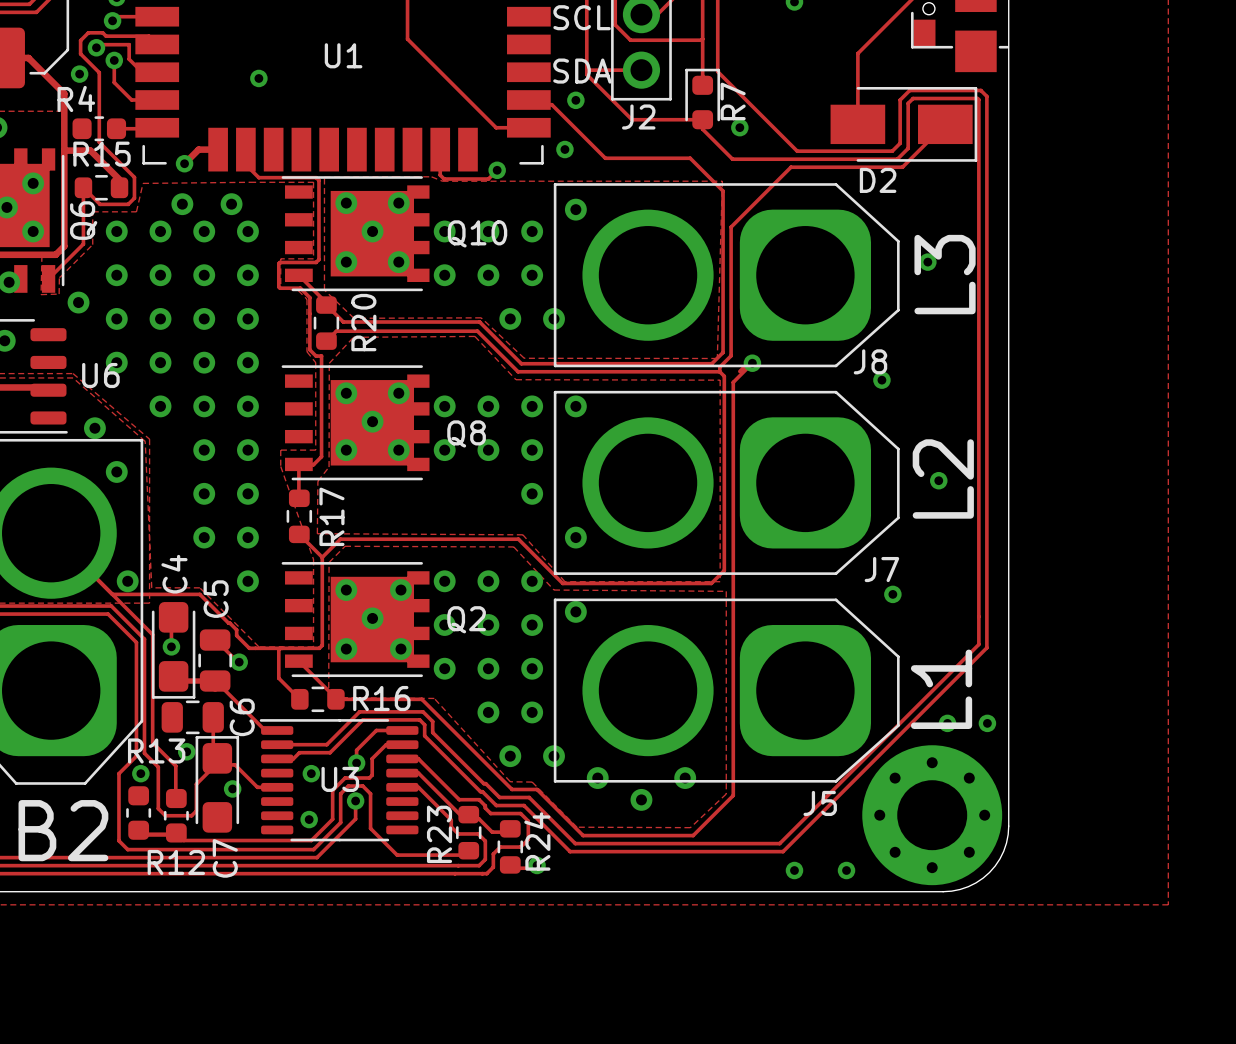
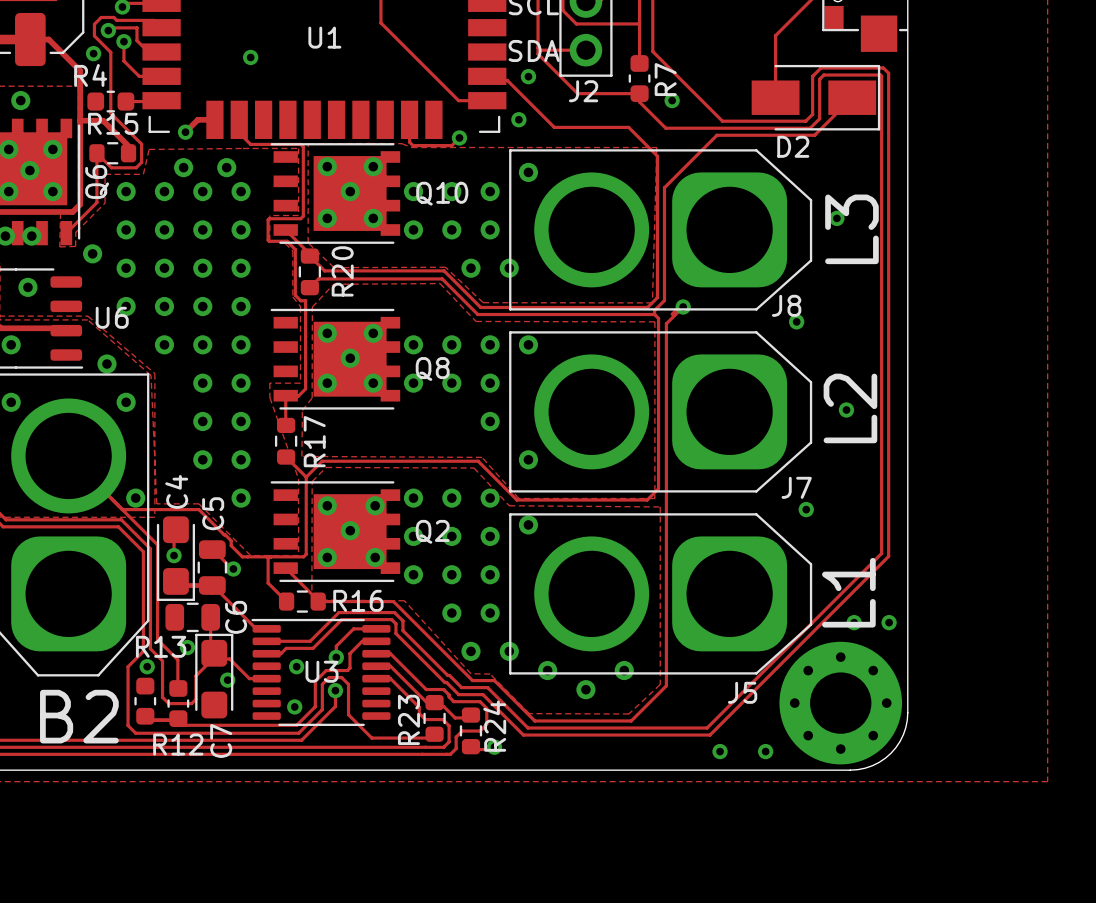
R7 footprint: [685, 68, 721, 130] -> [628, 55, 651, 103]

